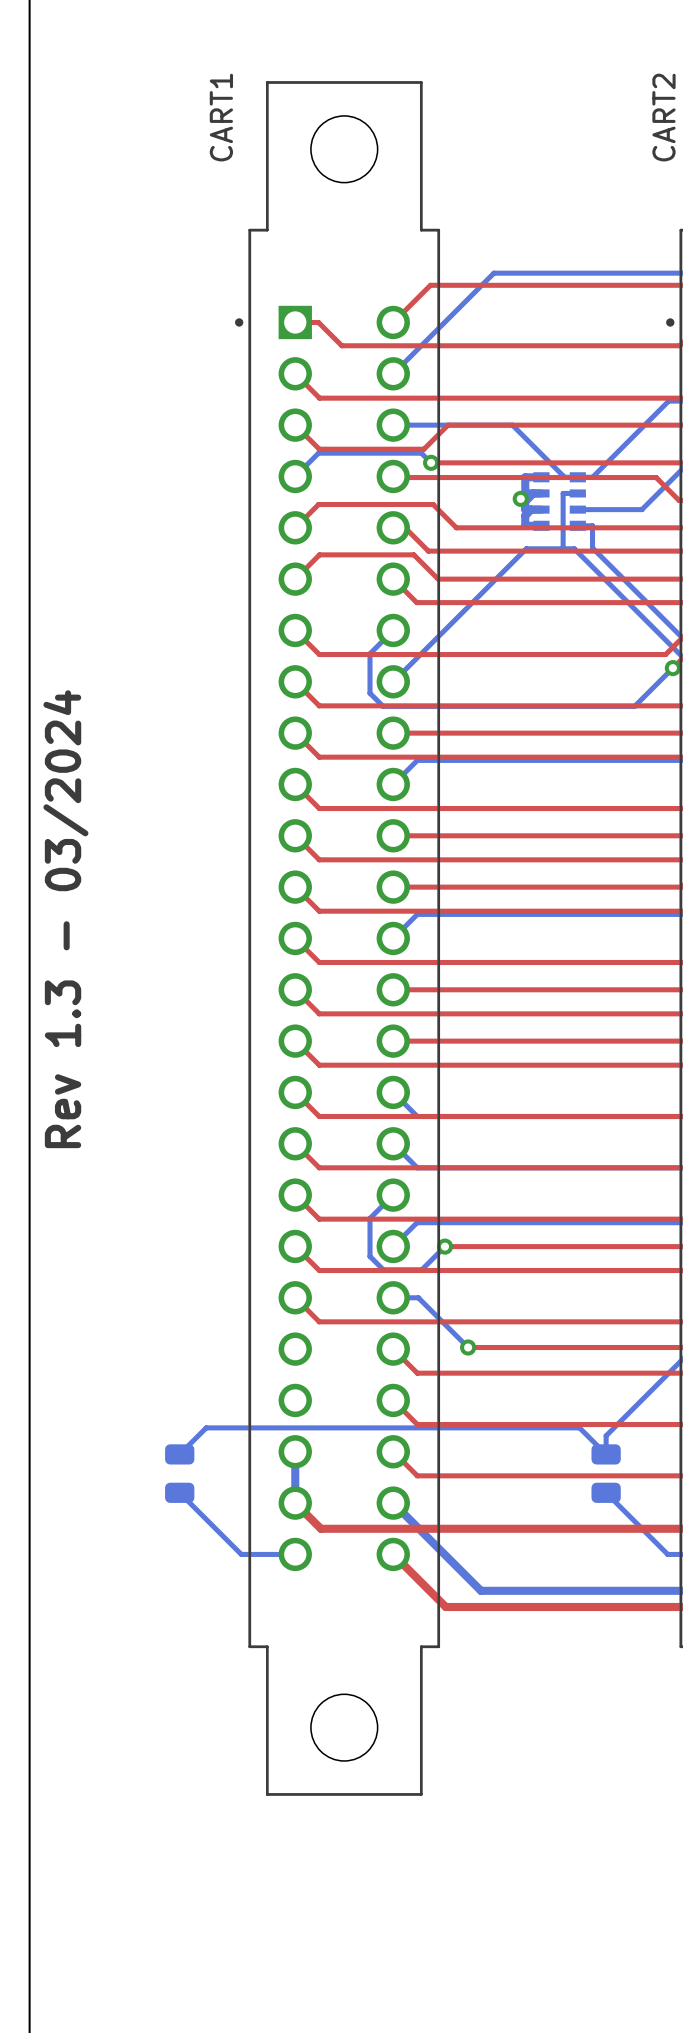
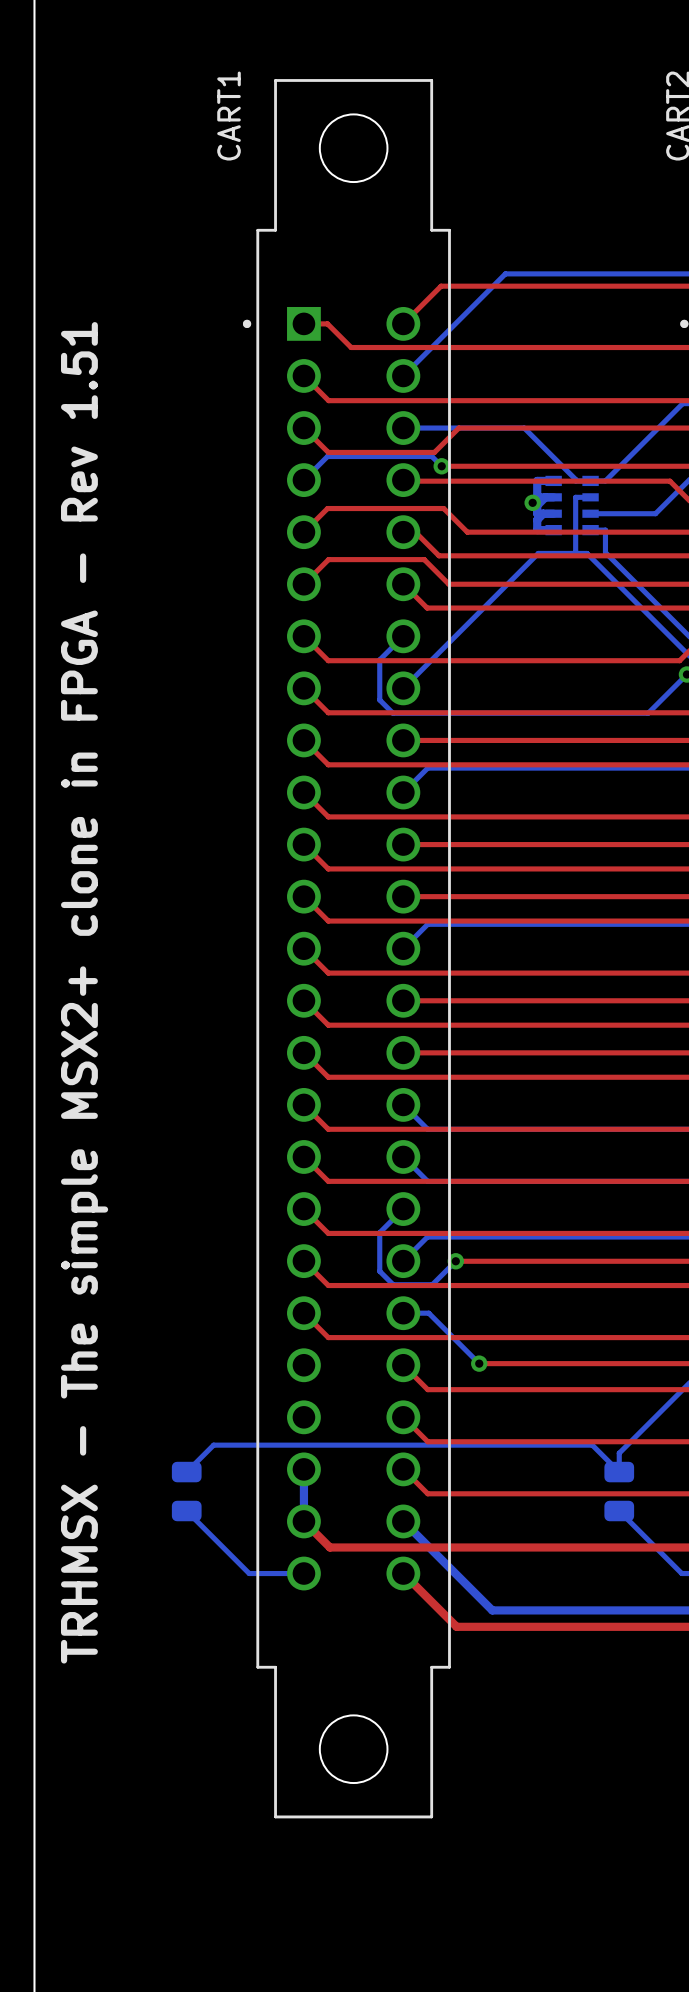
text: Rev 1.3 - 03/2024 (65, 919) -> none
text: none -> TRHMSX - The simple MSX2+ clone in FPGA - Rev 1.51 (84, 992)

